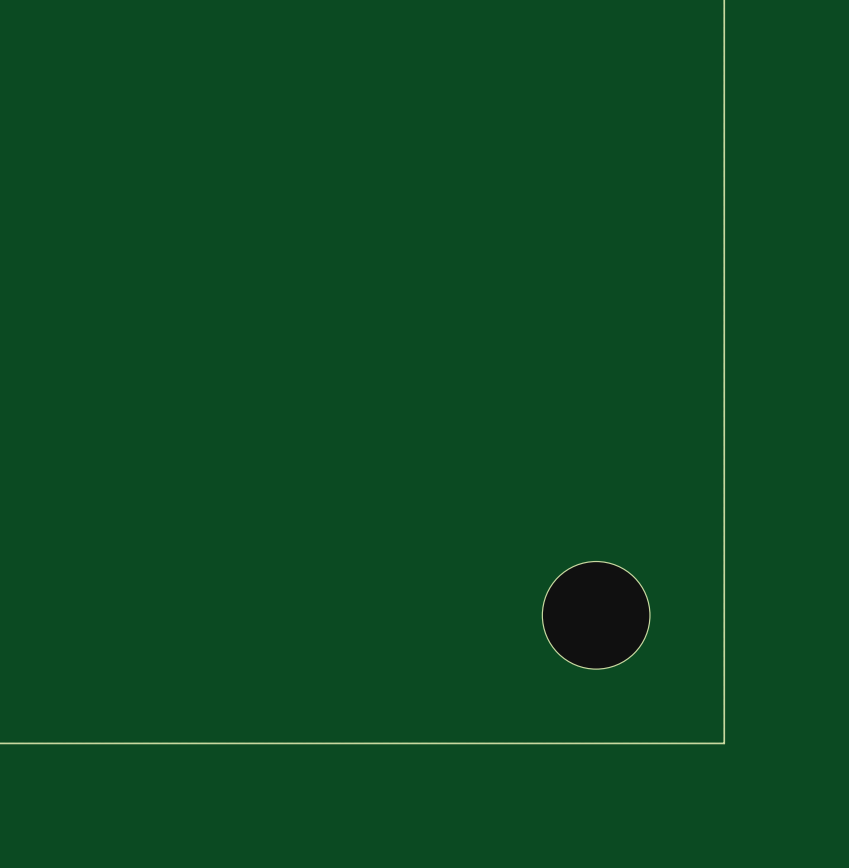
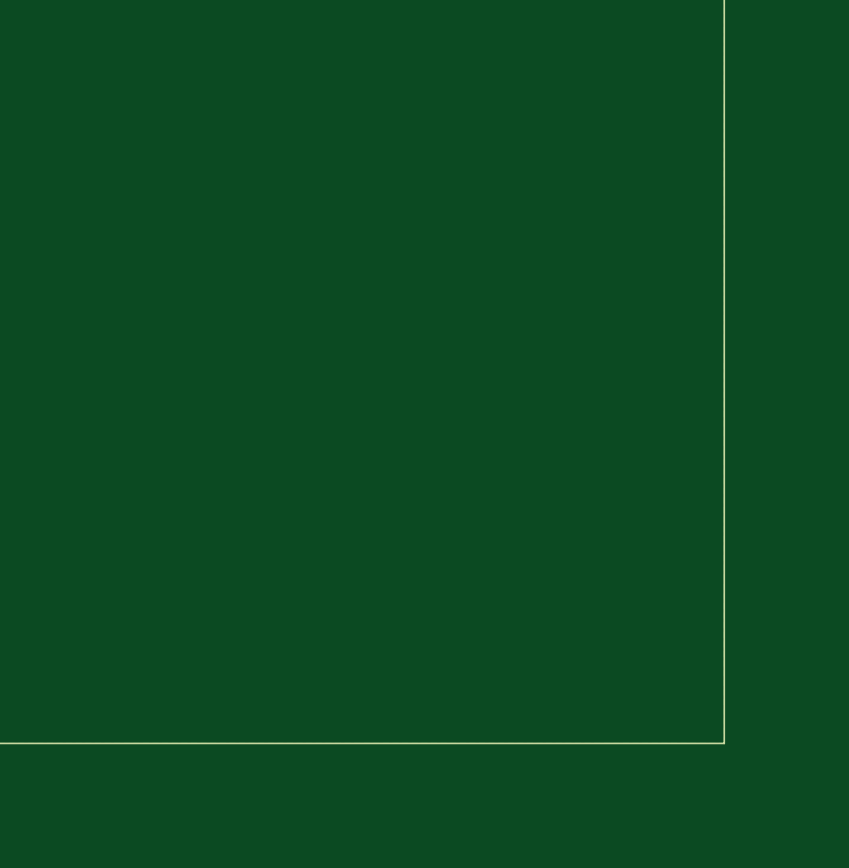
part: (596, 615) -> none

